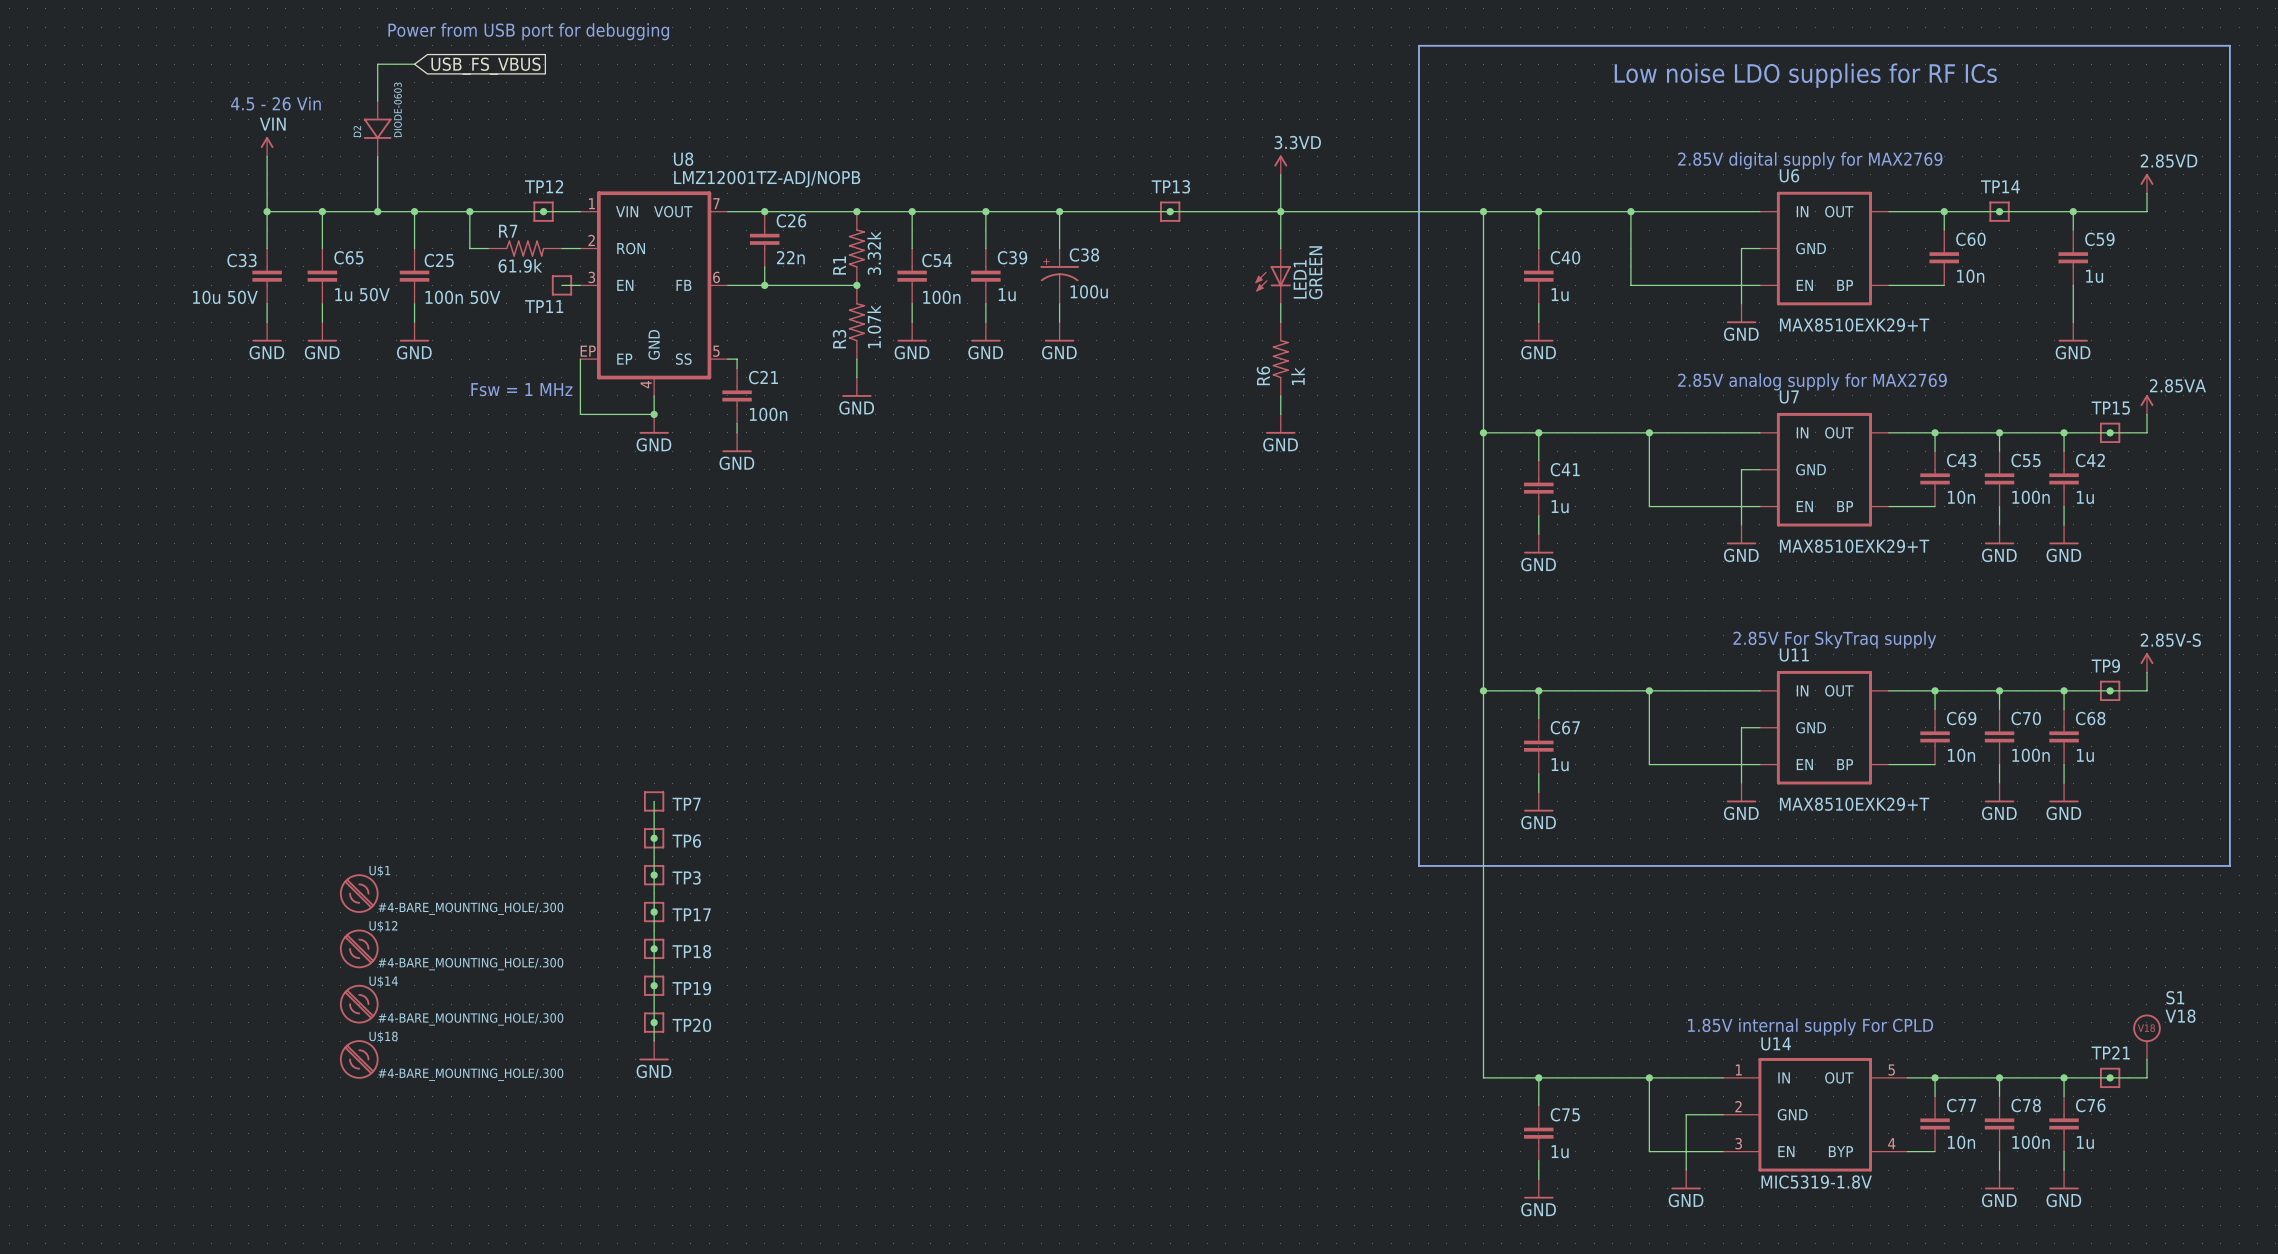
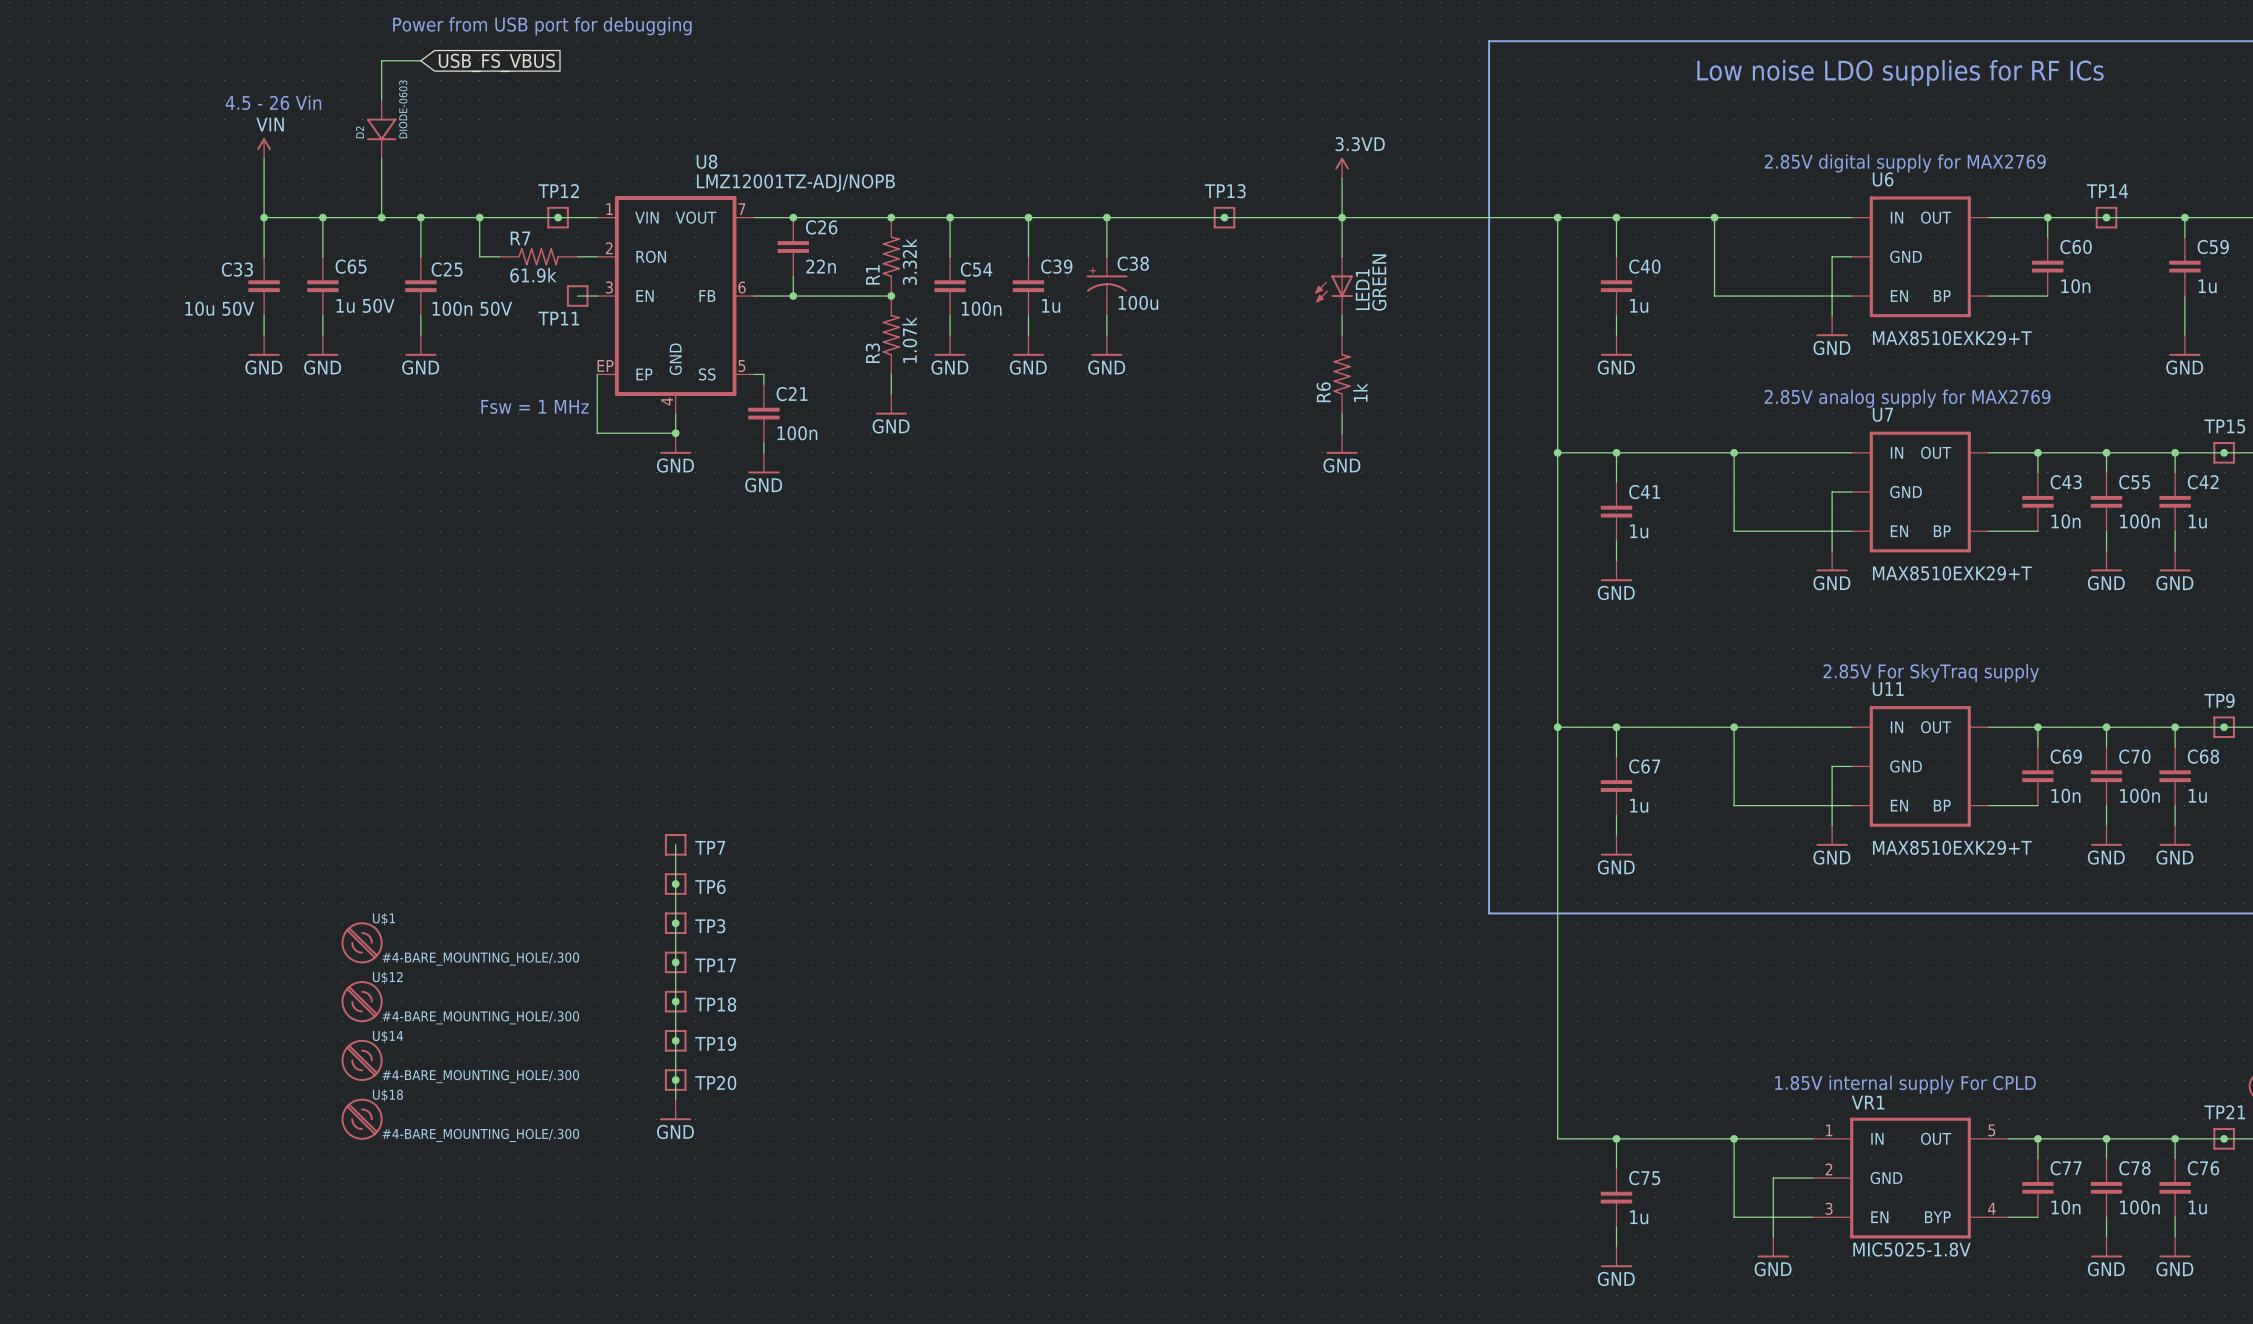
U14 name: U14 (1776, 1043) -> VR1 (1868, 1102)
U14 value: MIC5319-1.8V (1816, 1182) -> MIC5025-1.8V (1912, 1249)

